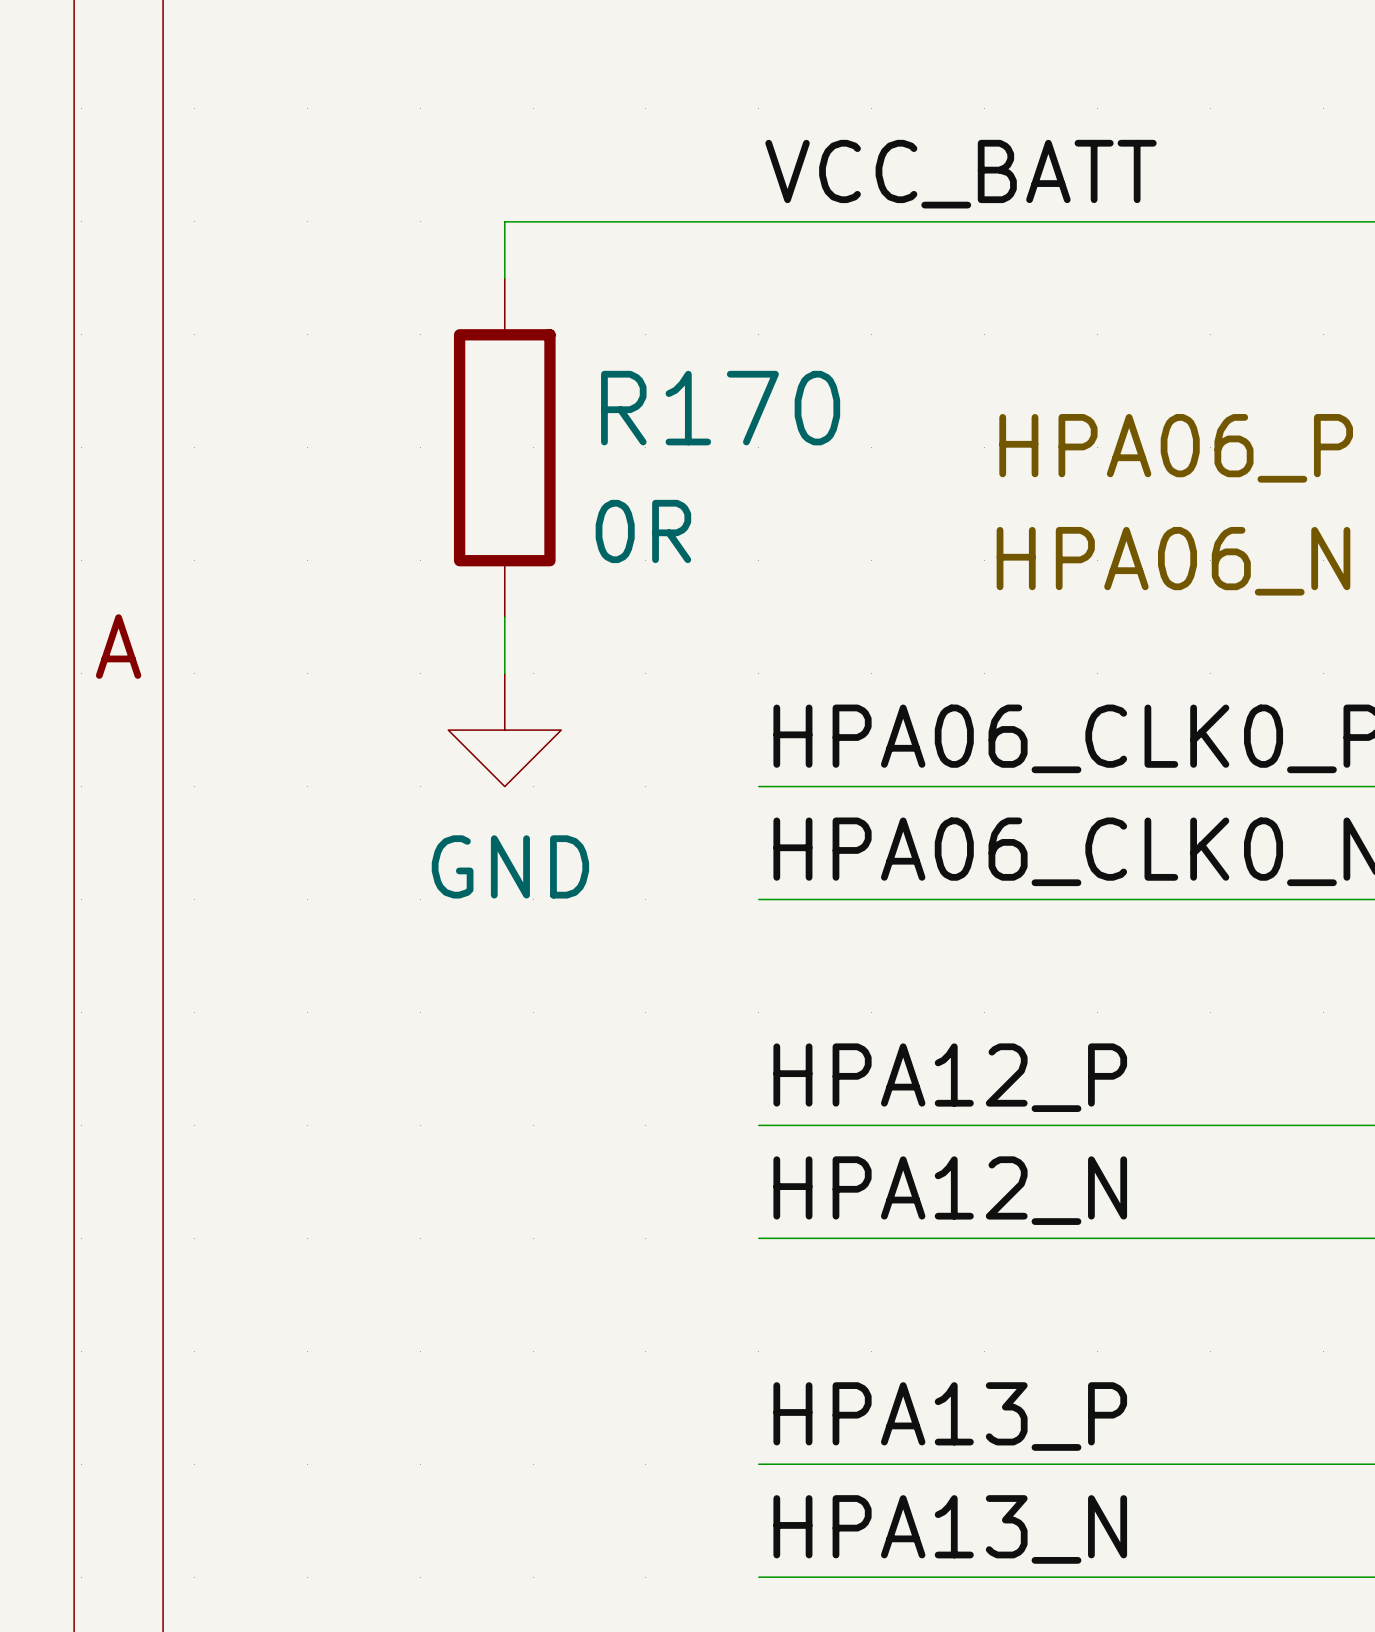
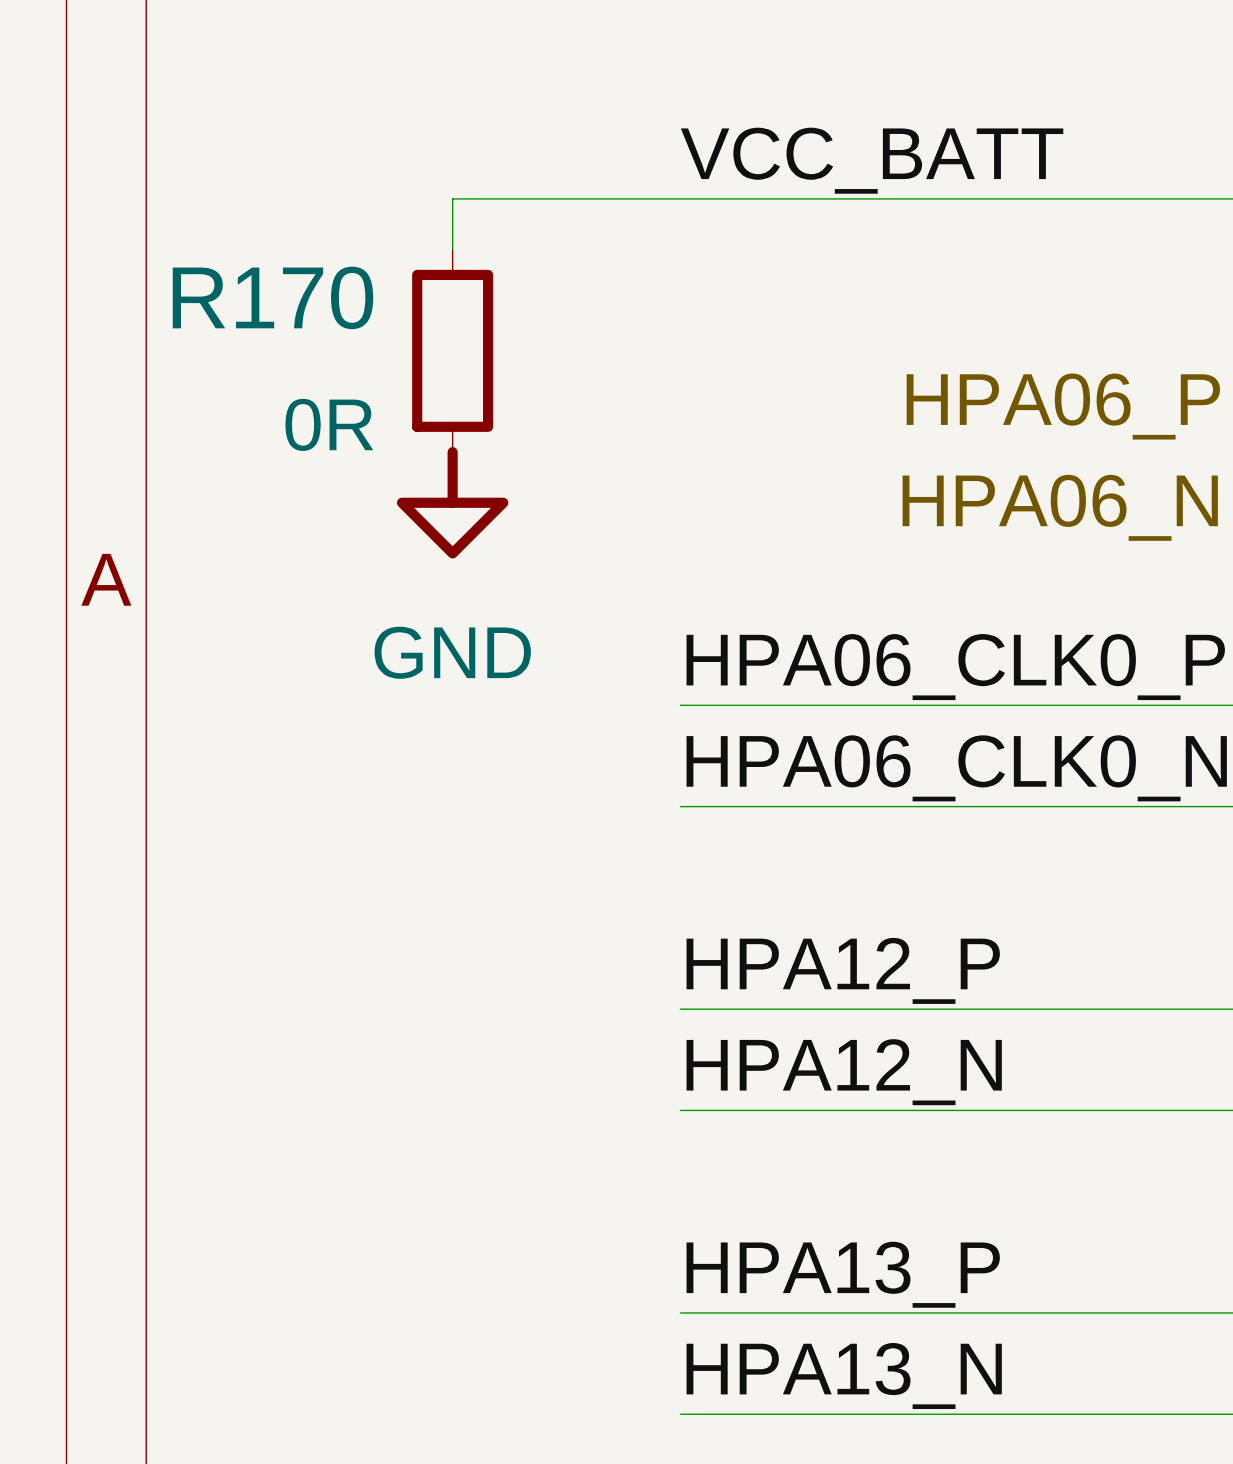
R170 symbol: [453, 278, 556, 618] -> [412, 249, 494, 453]
R170 name position: R170 (720, 408) -> R170 (273, 297)
R170 text position: 0R (643, 531) -> 0R (329, 424)
power symbol: none -> GND (452, 502)
wire: (504, 617) (504, 673) -> none
power symbol: GND (504, 730) -> none

